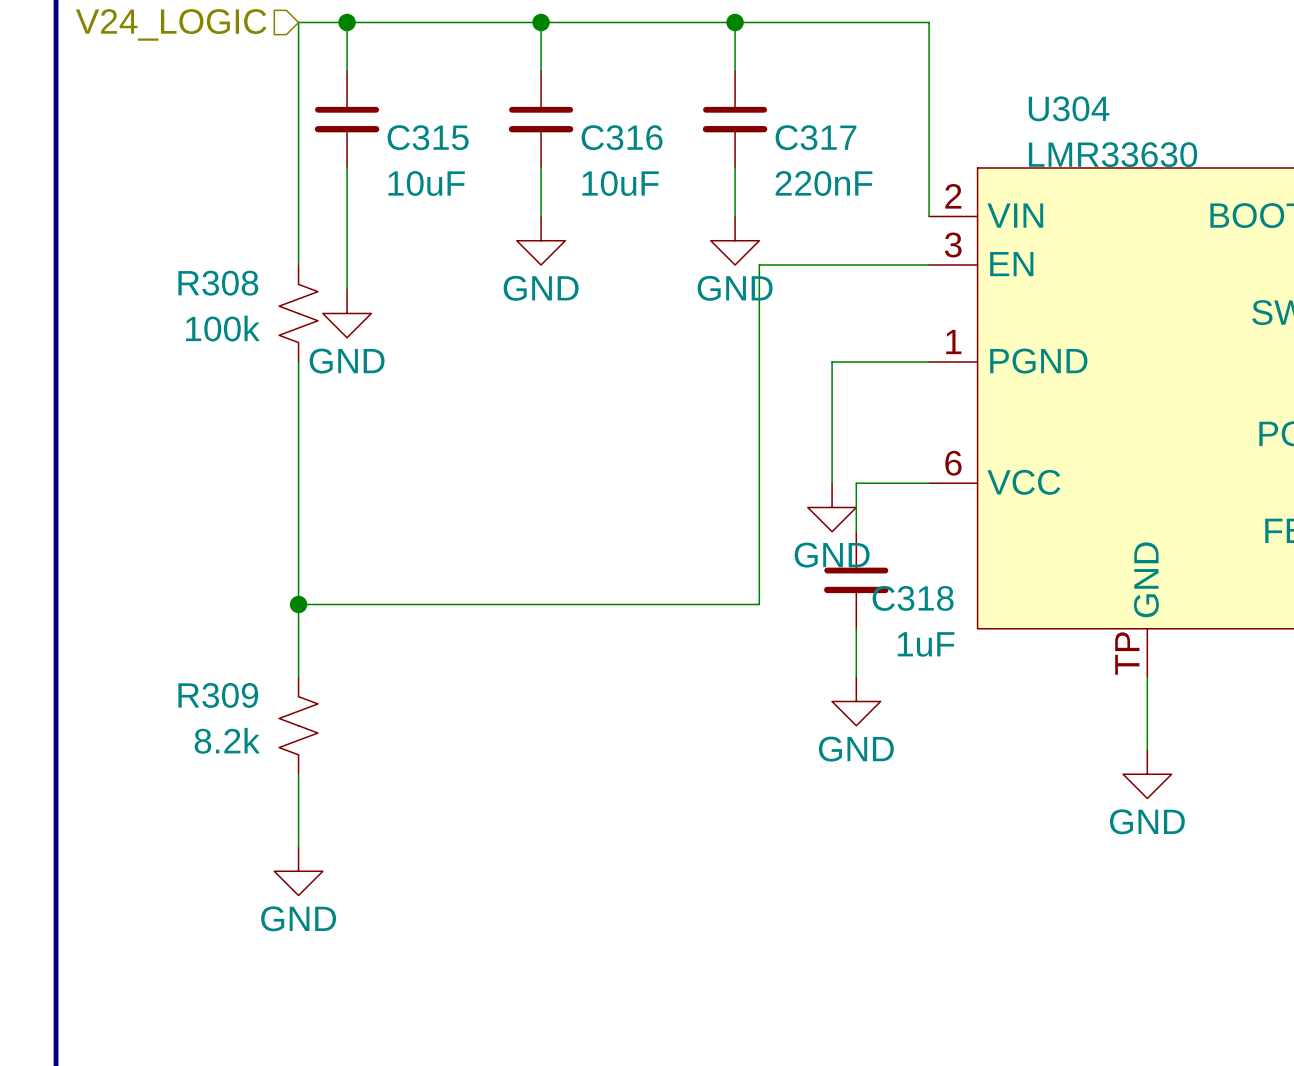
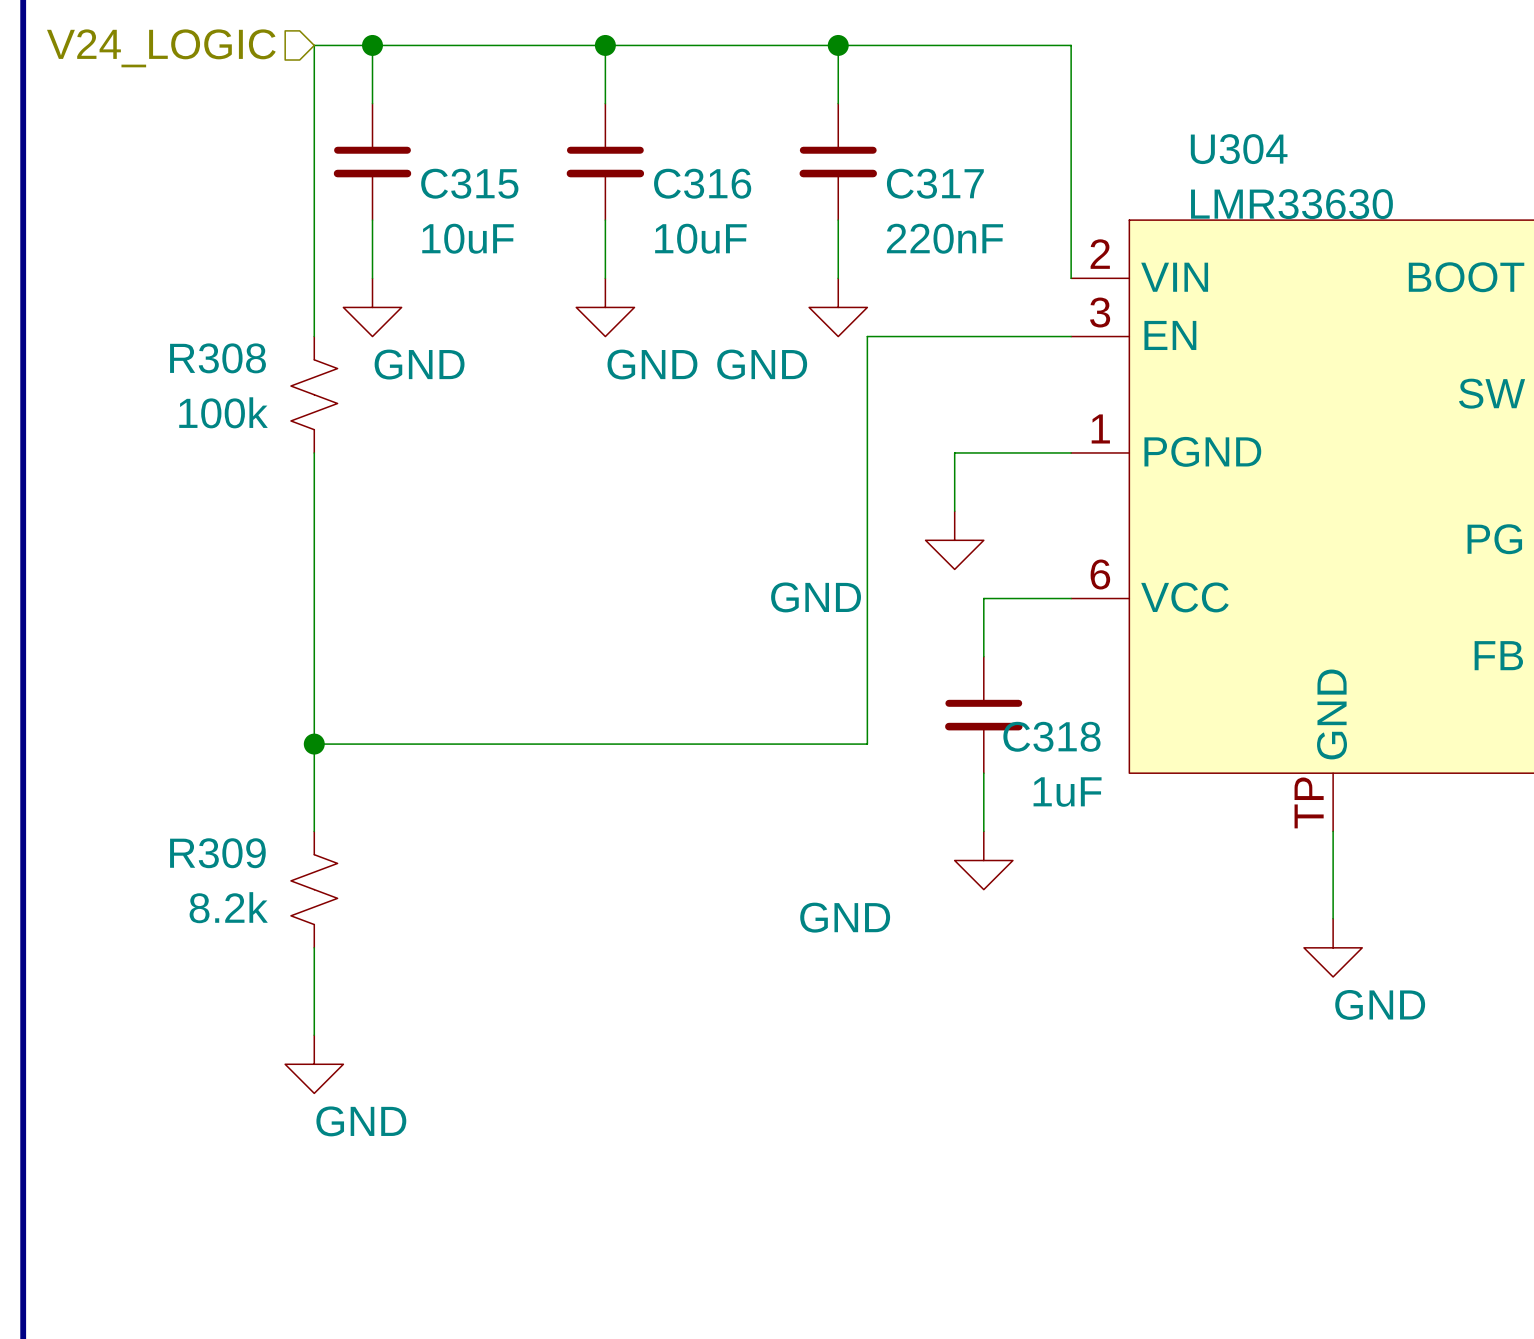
wire: (347, 216) (347, 289) -> none
power symbol text position: GND (541, 288) -> GND (652, 364)
power symbol text position: GND (735, 288) -> GND (762, 364)
power symbol position: GND (347, 313) -> GND (372, 307)
power symbol text position: GND (347, 361) -> GND (419, 364)
wire: (832, 410) (832, 483) -> none
power symbol position: GND (832, 507) -> GND (954, 540)
power symbol text position: GND (832, 555) -> GND (816, 597)
power symbol text position: GND (856, 749) -> GND (845, 917)
power symbol text position: GND (1147, 821) -> GND (1380, 1004)
power symbol text position: GND (298, 918) -> GND (361, 1121)

